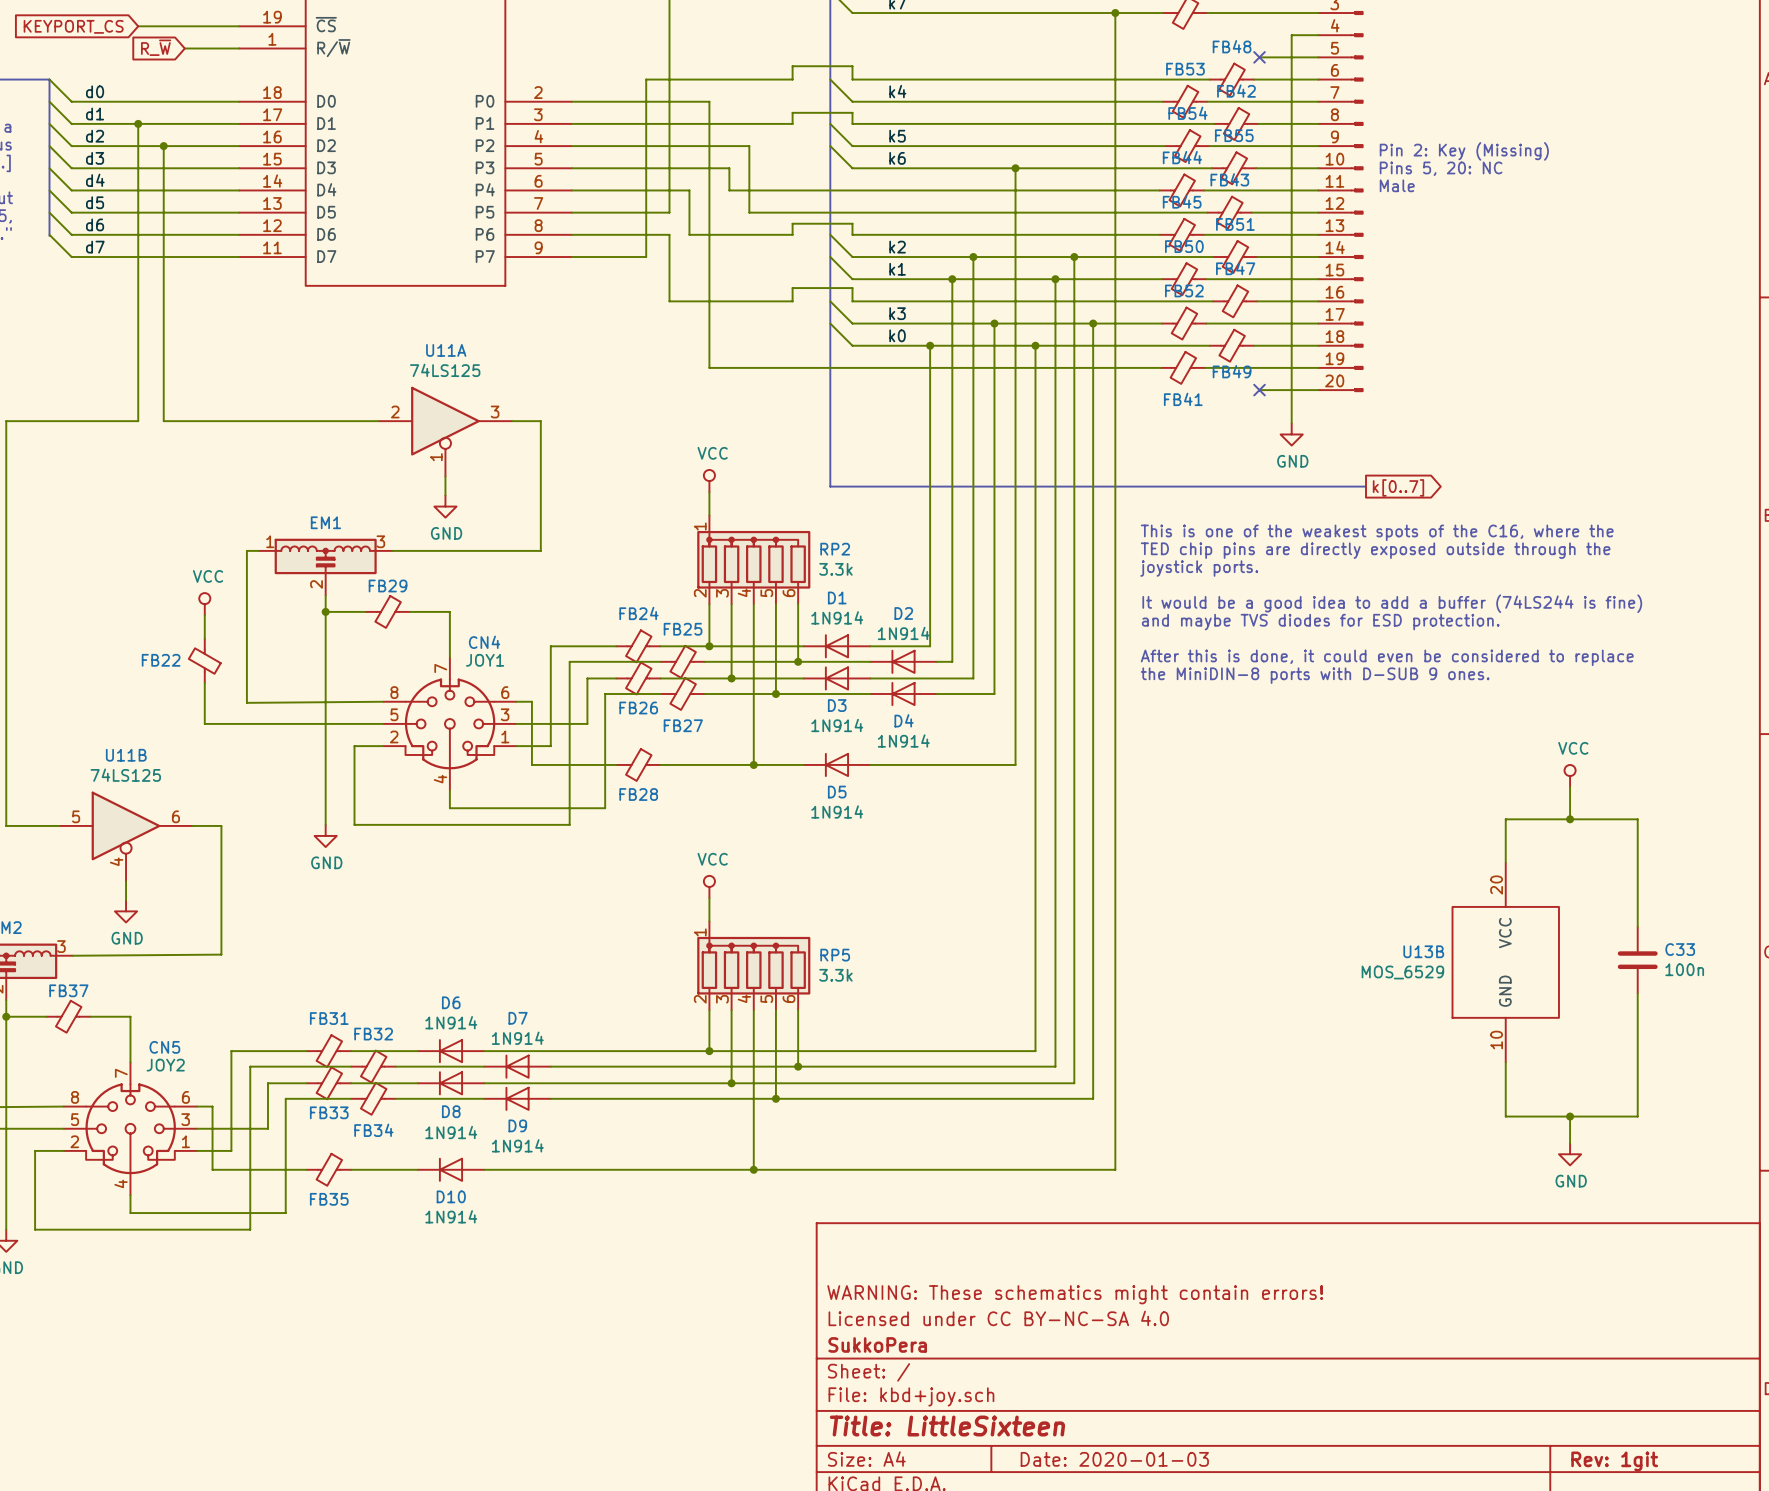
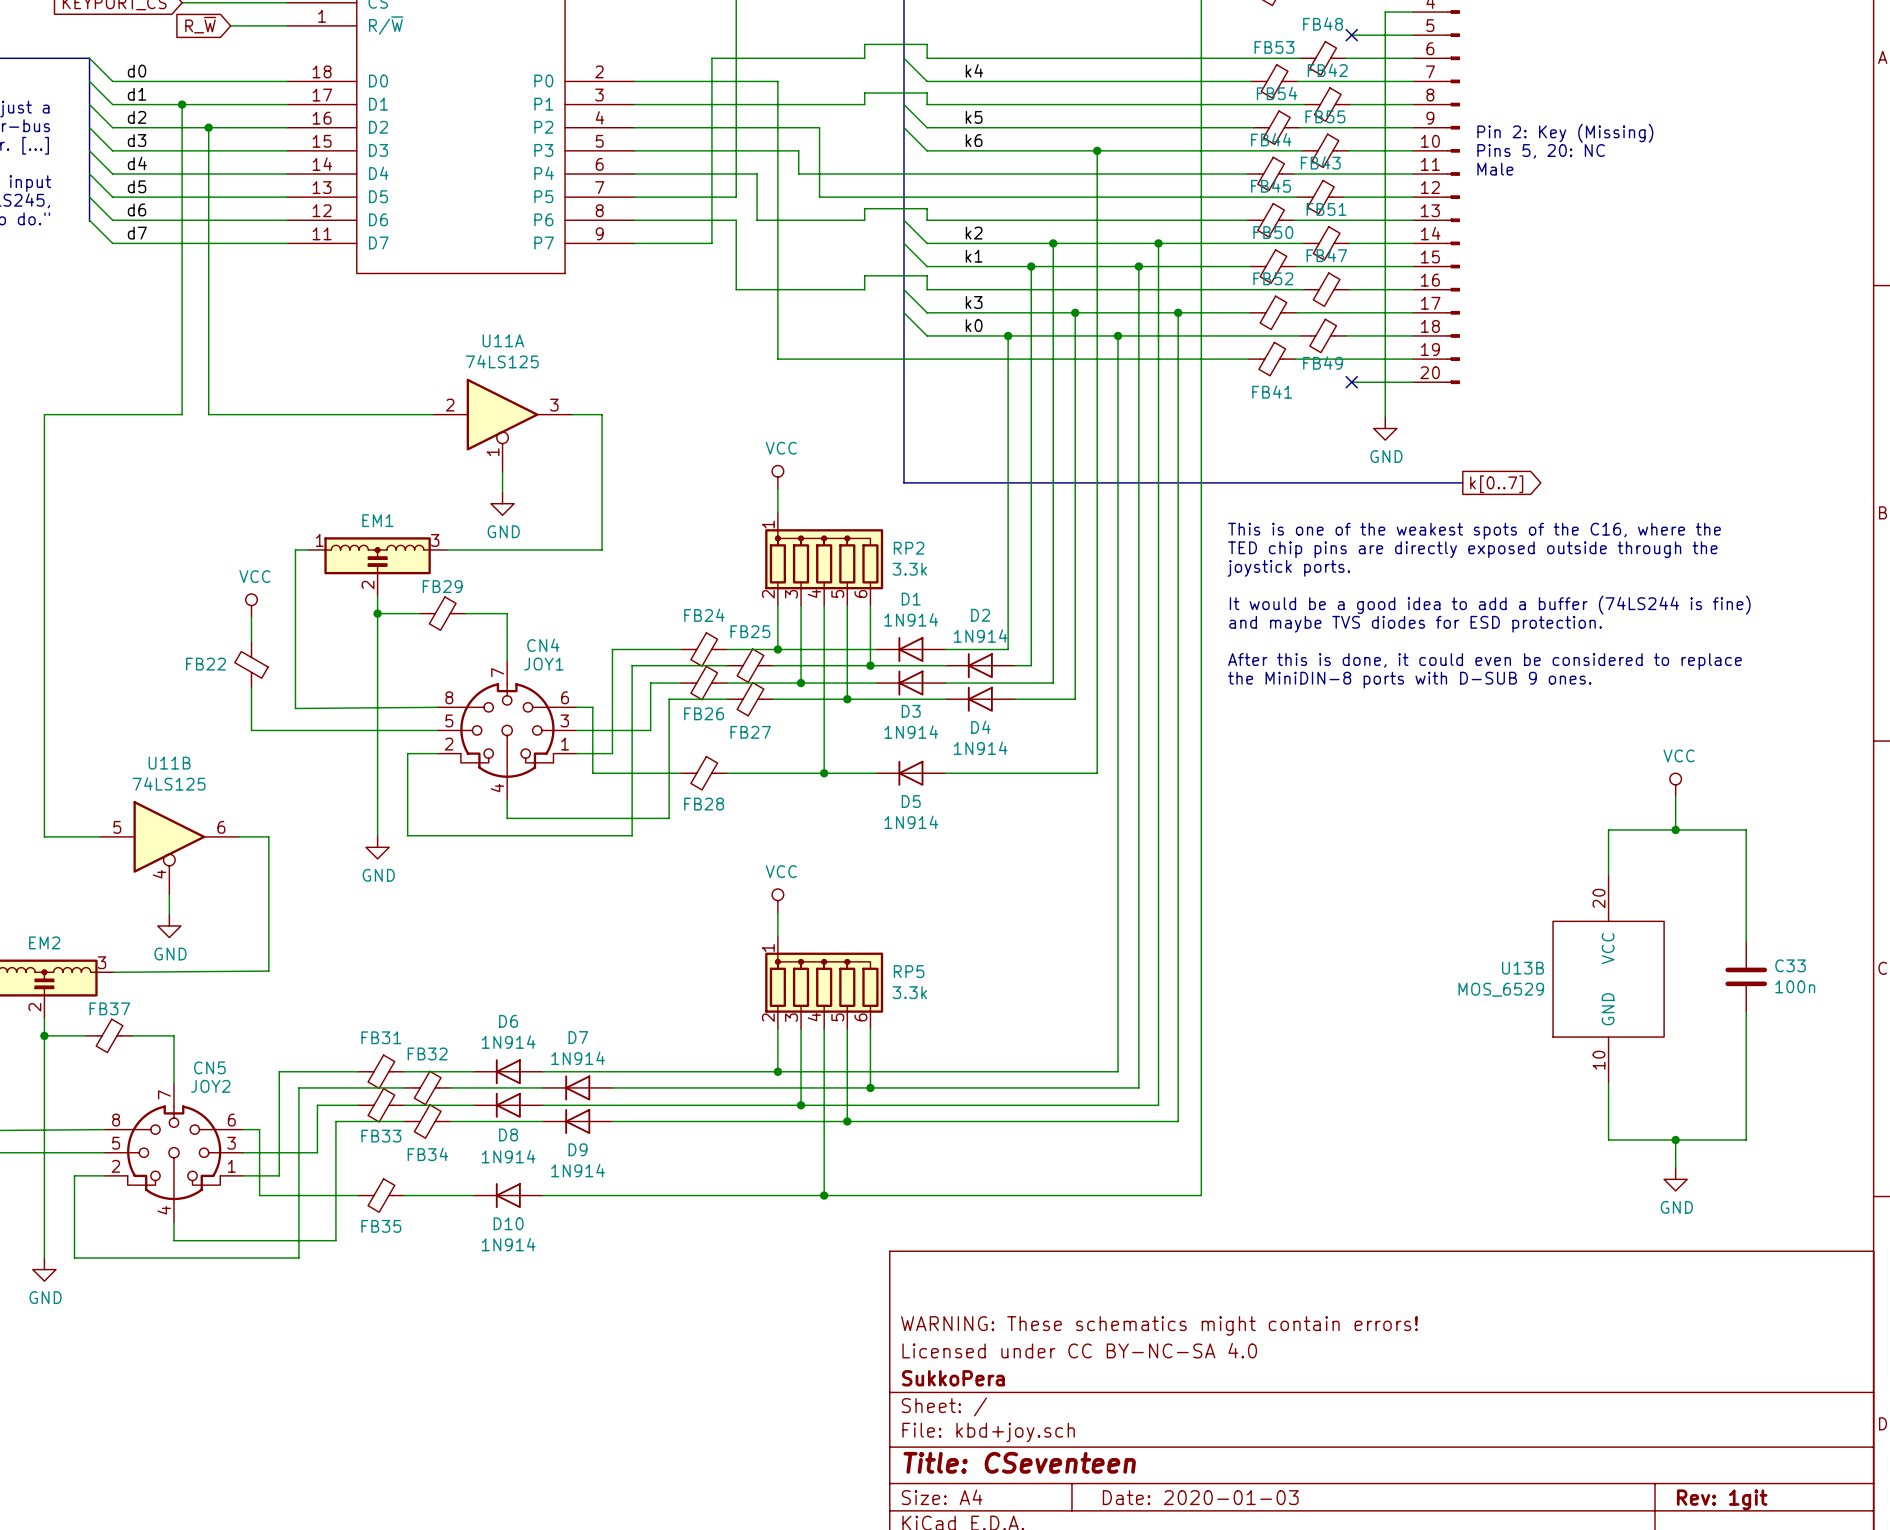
title block: Title: LittleSixteen (947, 1426) -> Title: CSeventeen (1019, 1462)

